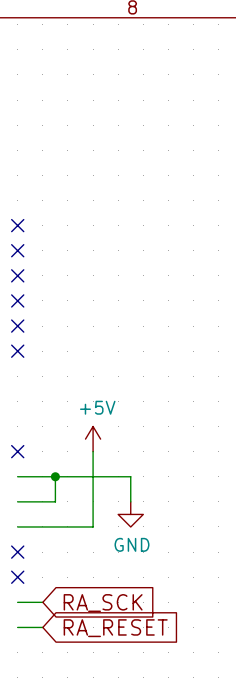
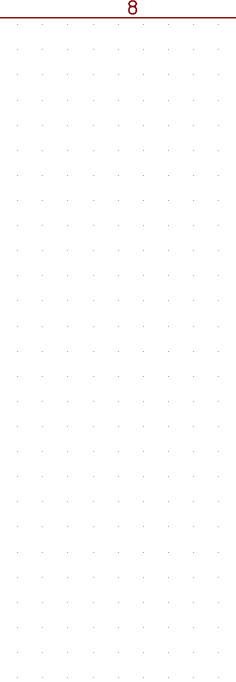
no-connect mark: (17, 225) -> none
no-connect mark: (17, 250) -> none
no-connect mark: (17, 275) -> none
no-connect mark: (17, 300) -> none
no-connect mark: (17, 326) -> none
no-connect mark: (17, 351) -> none
power symbol: +5V (93, 439) -> none
no-connect mark: (17, 451) -> none
wire: (93, 451) (93, 526) (17, 526) -> none
wire: (17, 476) (130, 476) (130, 501) -> none
wire: (55, 476) (55, 501) (17, 501) -> none
junction: (55, 476) -> none
power symbol: GND (130, 514) -> none
no-connect mark: (17, 552) -> none
no-connect mark: (17, 577) -> none
wire: (17, 602) (42, 602) -> none
global label: RA_SCK (103, 603) -> none
wire: (17, 627) (42, 627) -> none
global label: RA_RESET (115, 628) -> none

